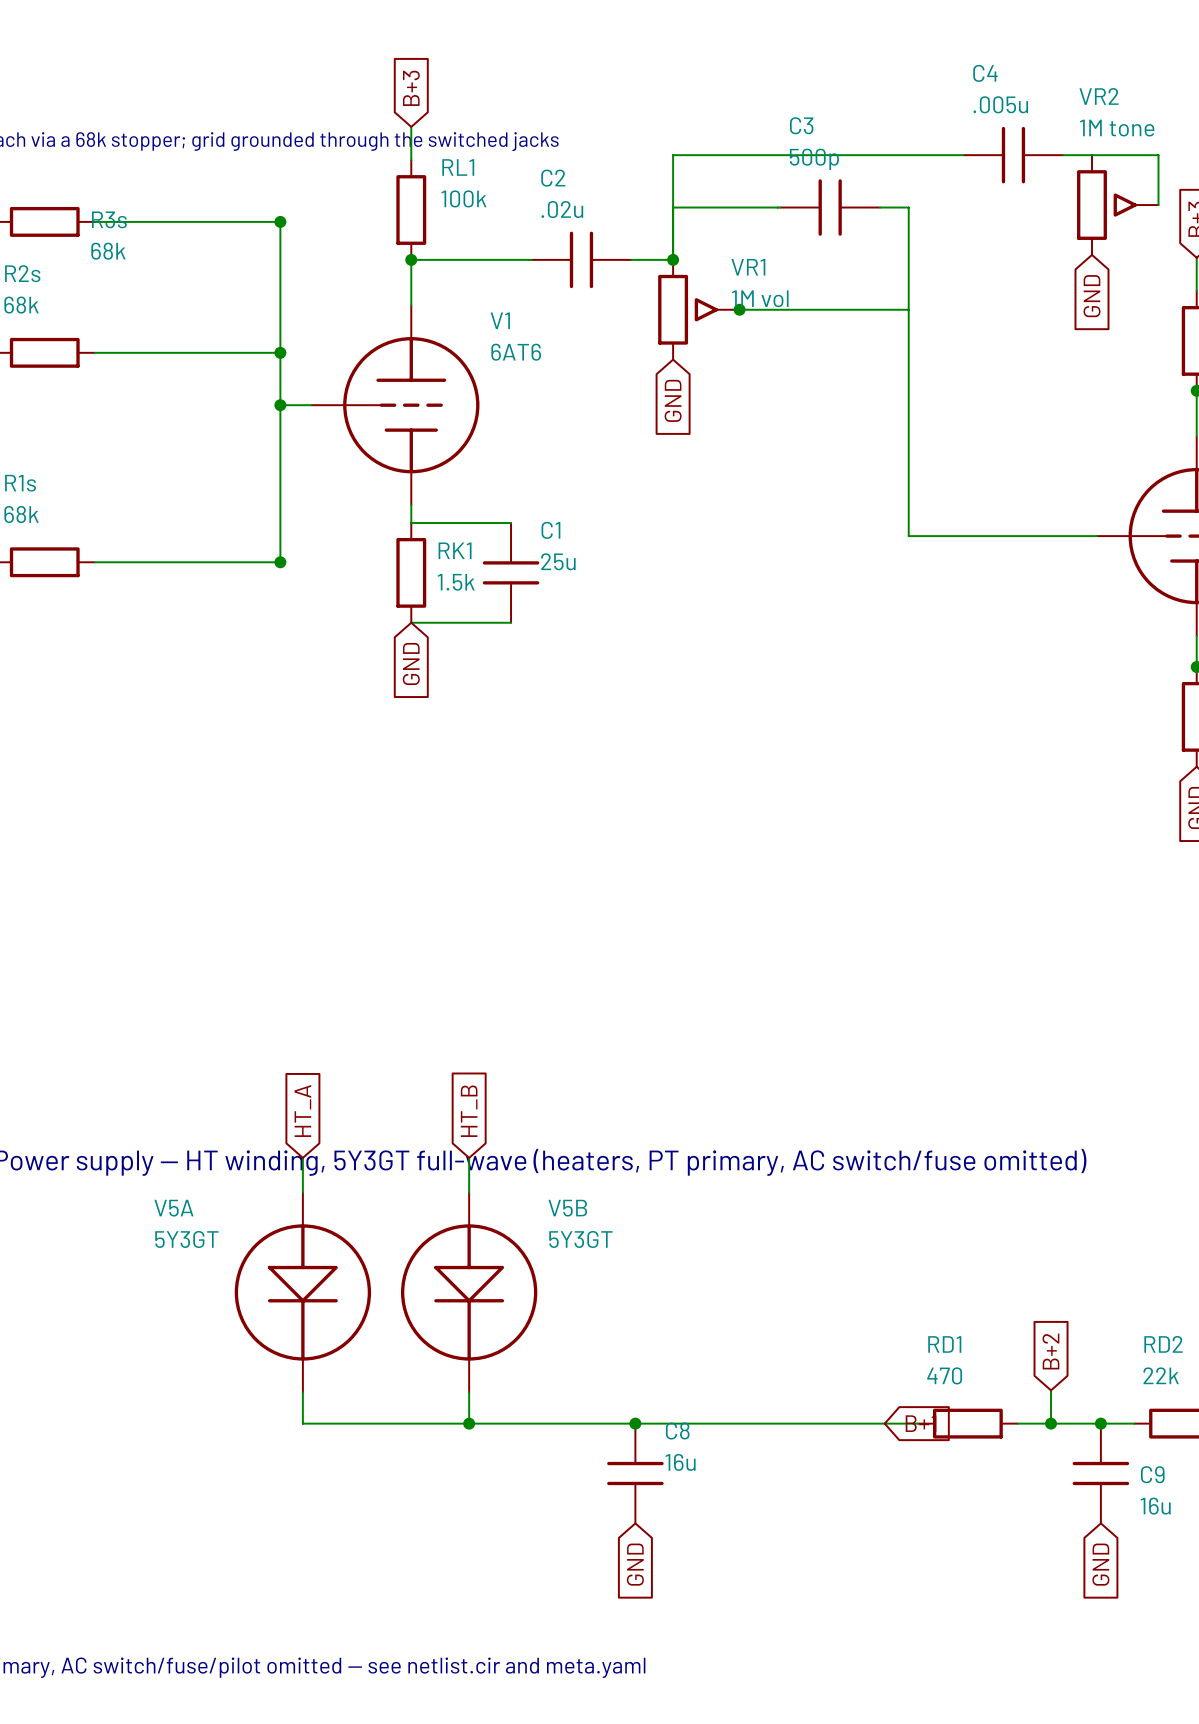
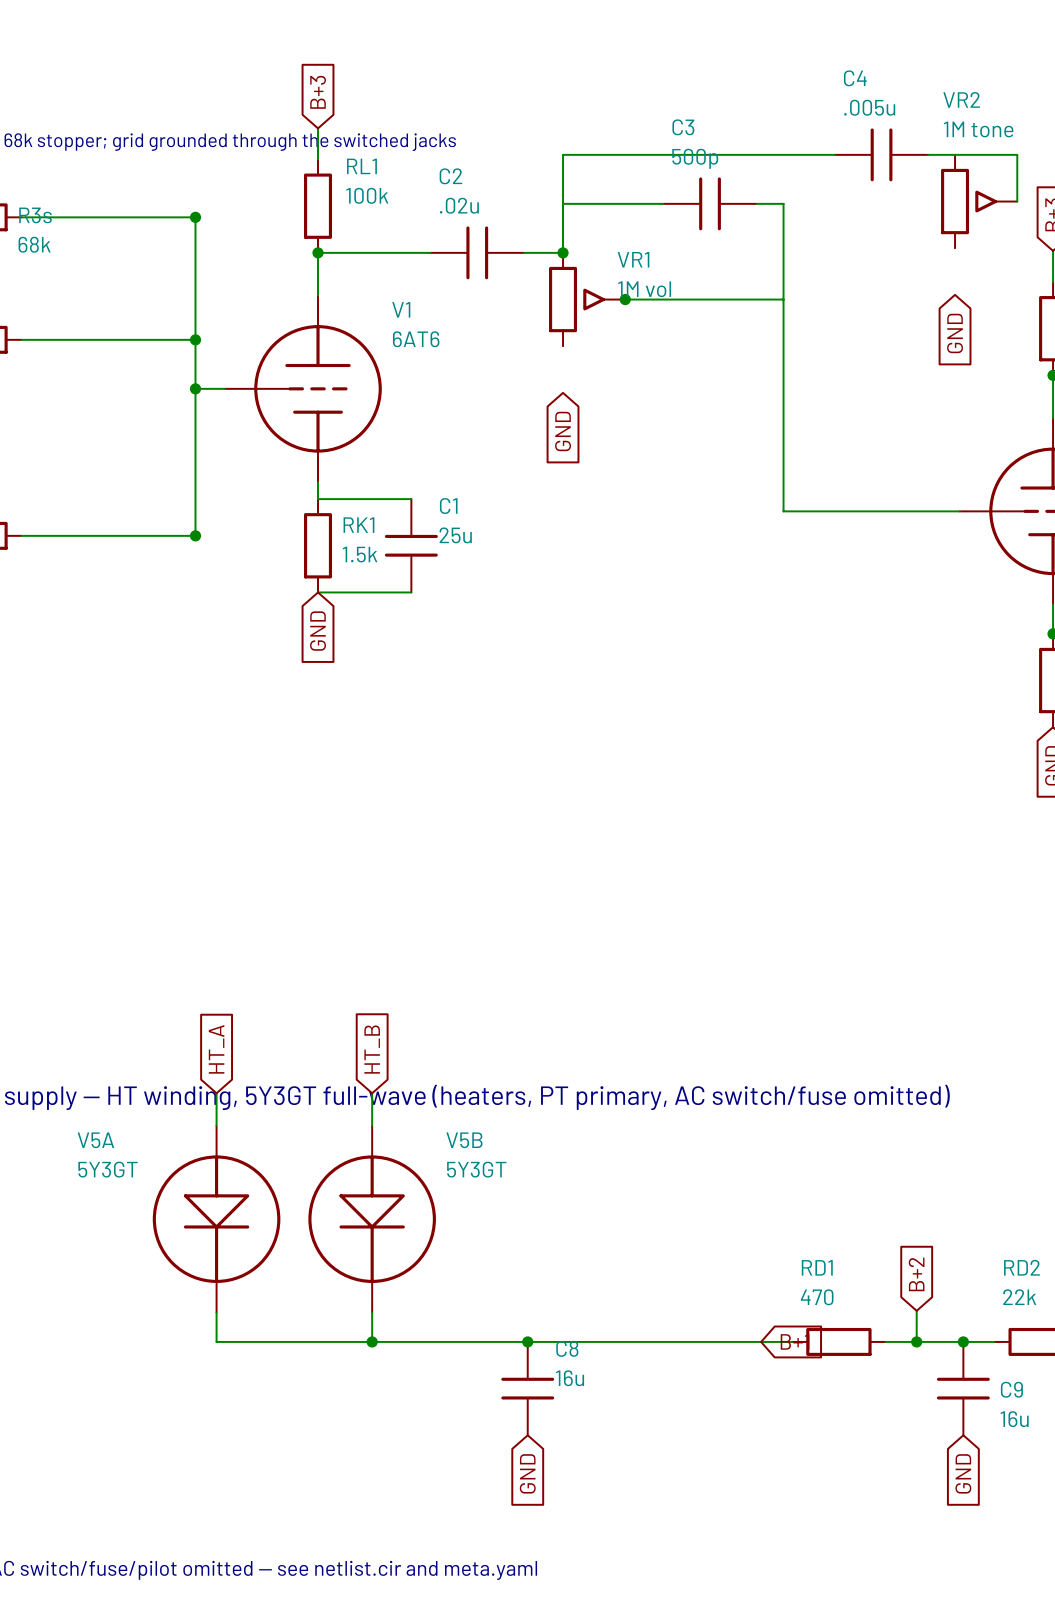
global label position: GND (1091, 296) -> GND (955, 333)
global label position: GND (673, 400) -> GND (563, 431)

